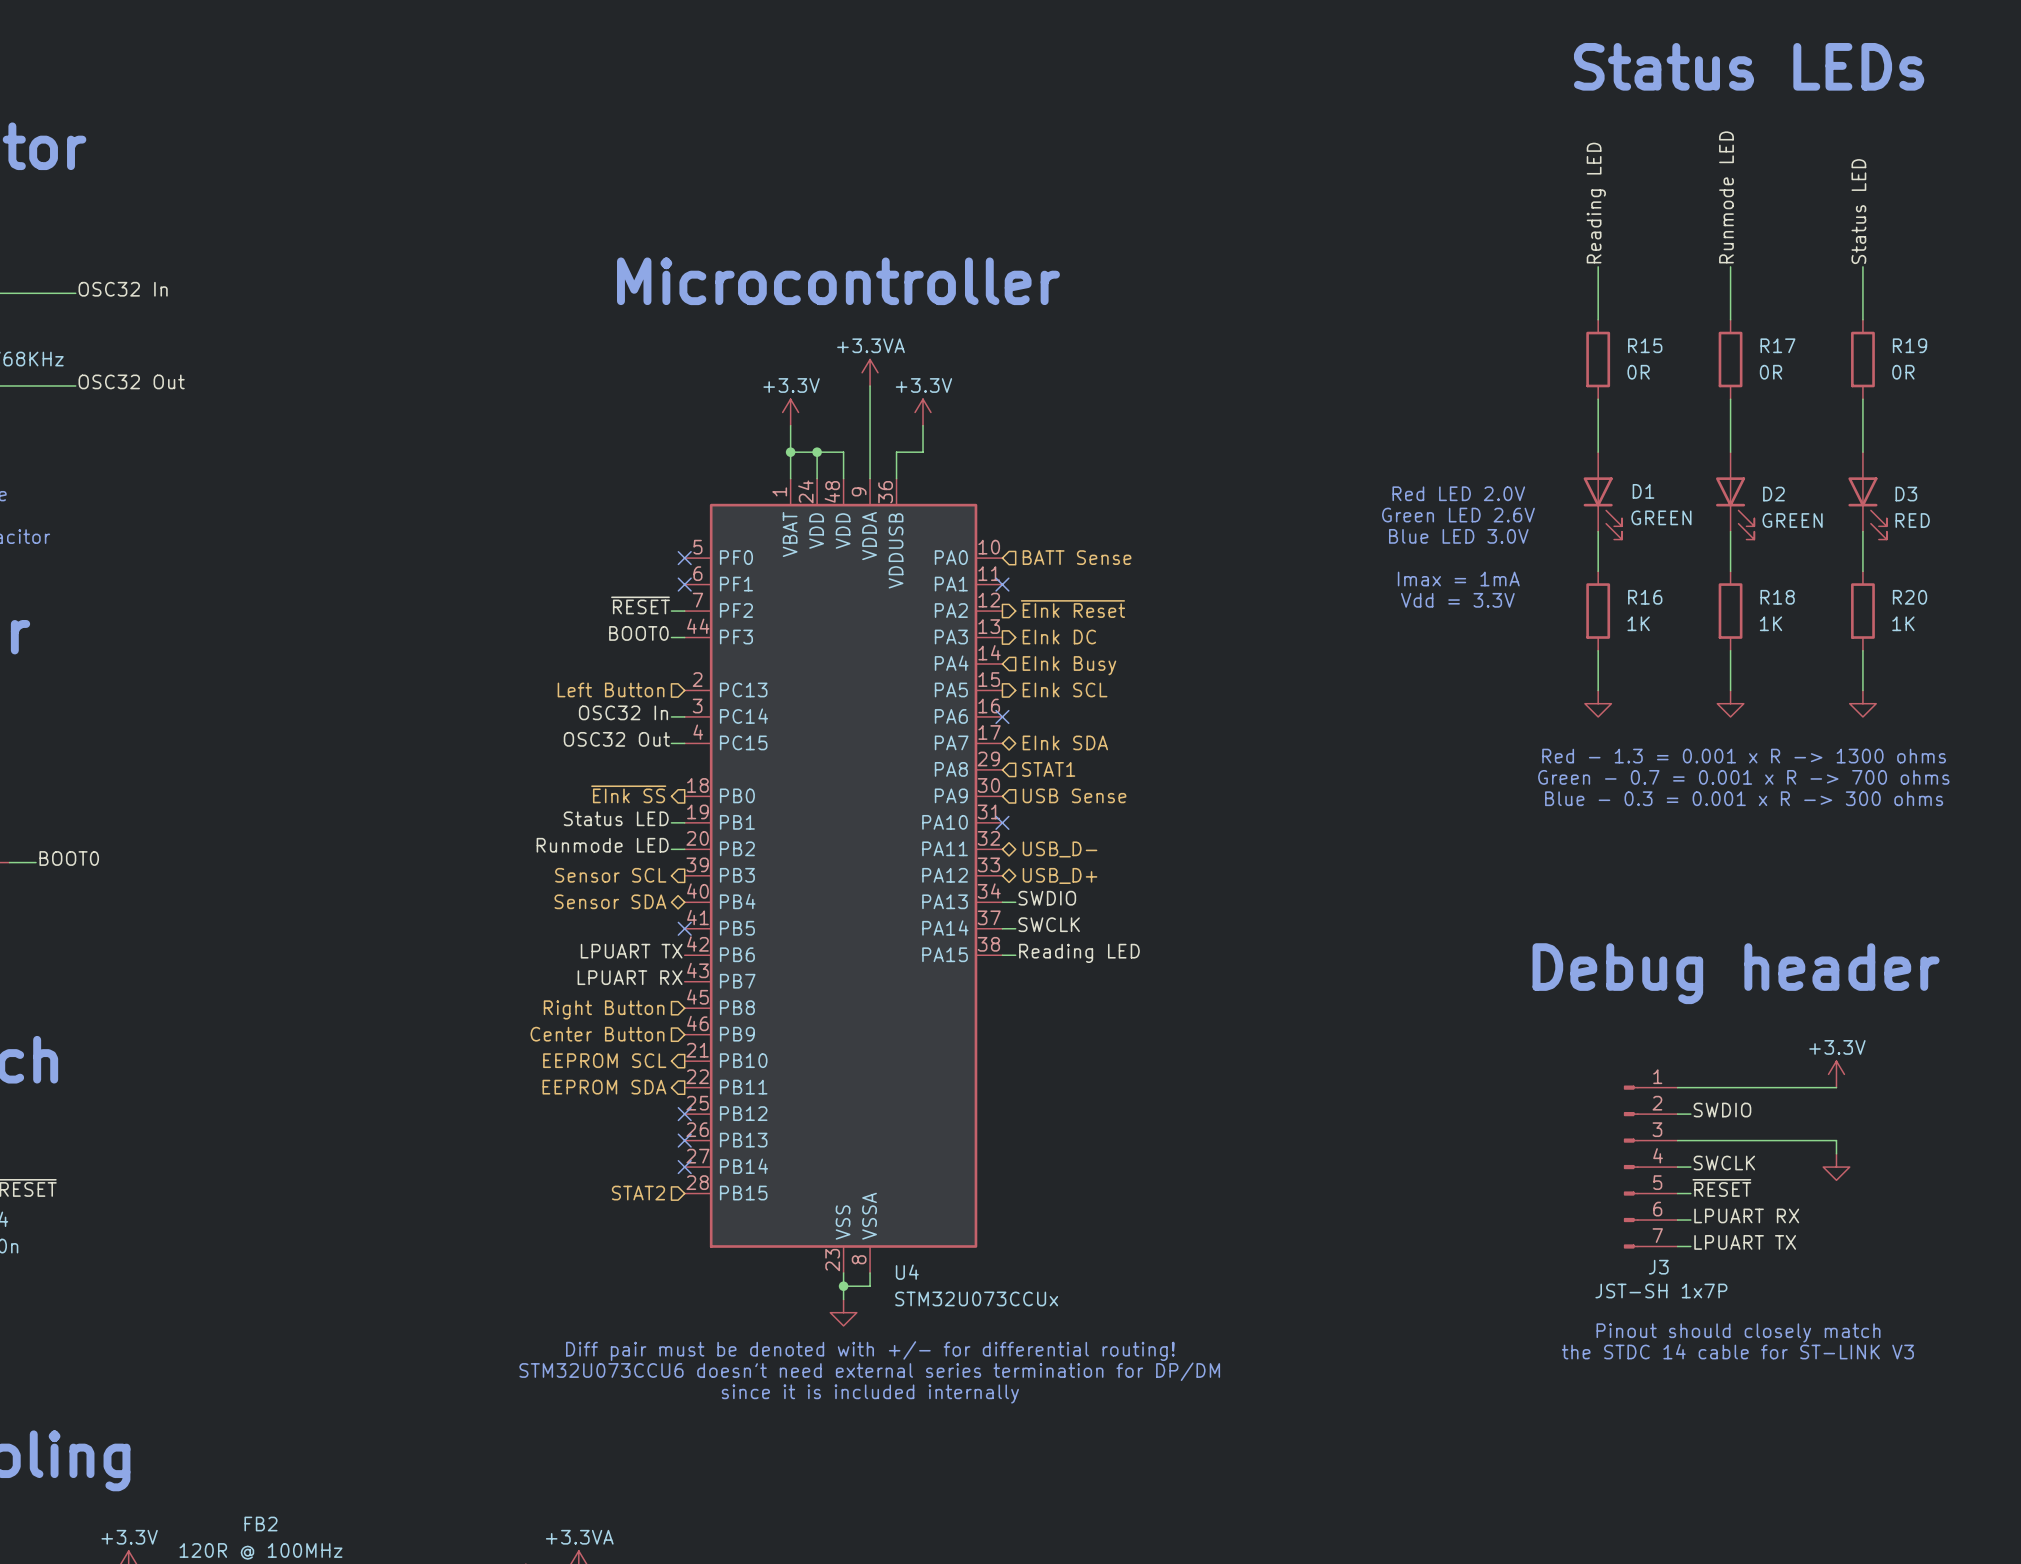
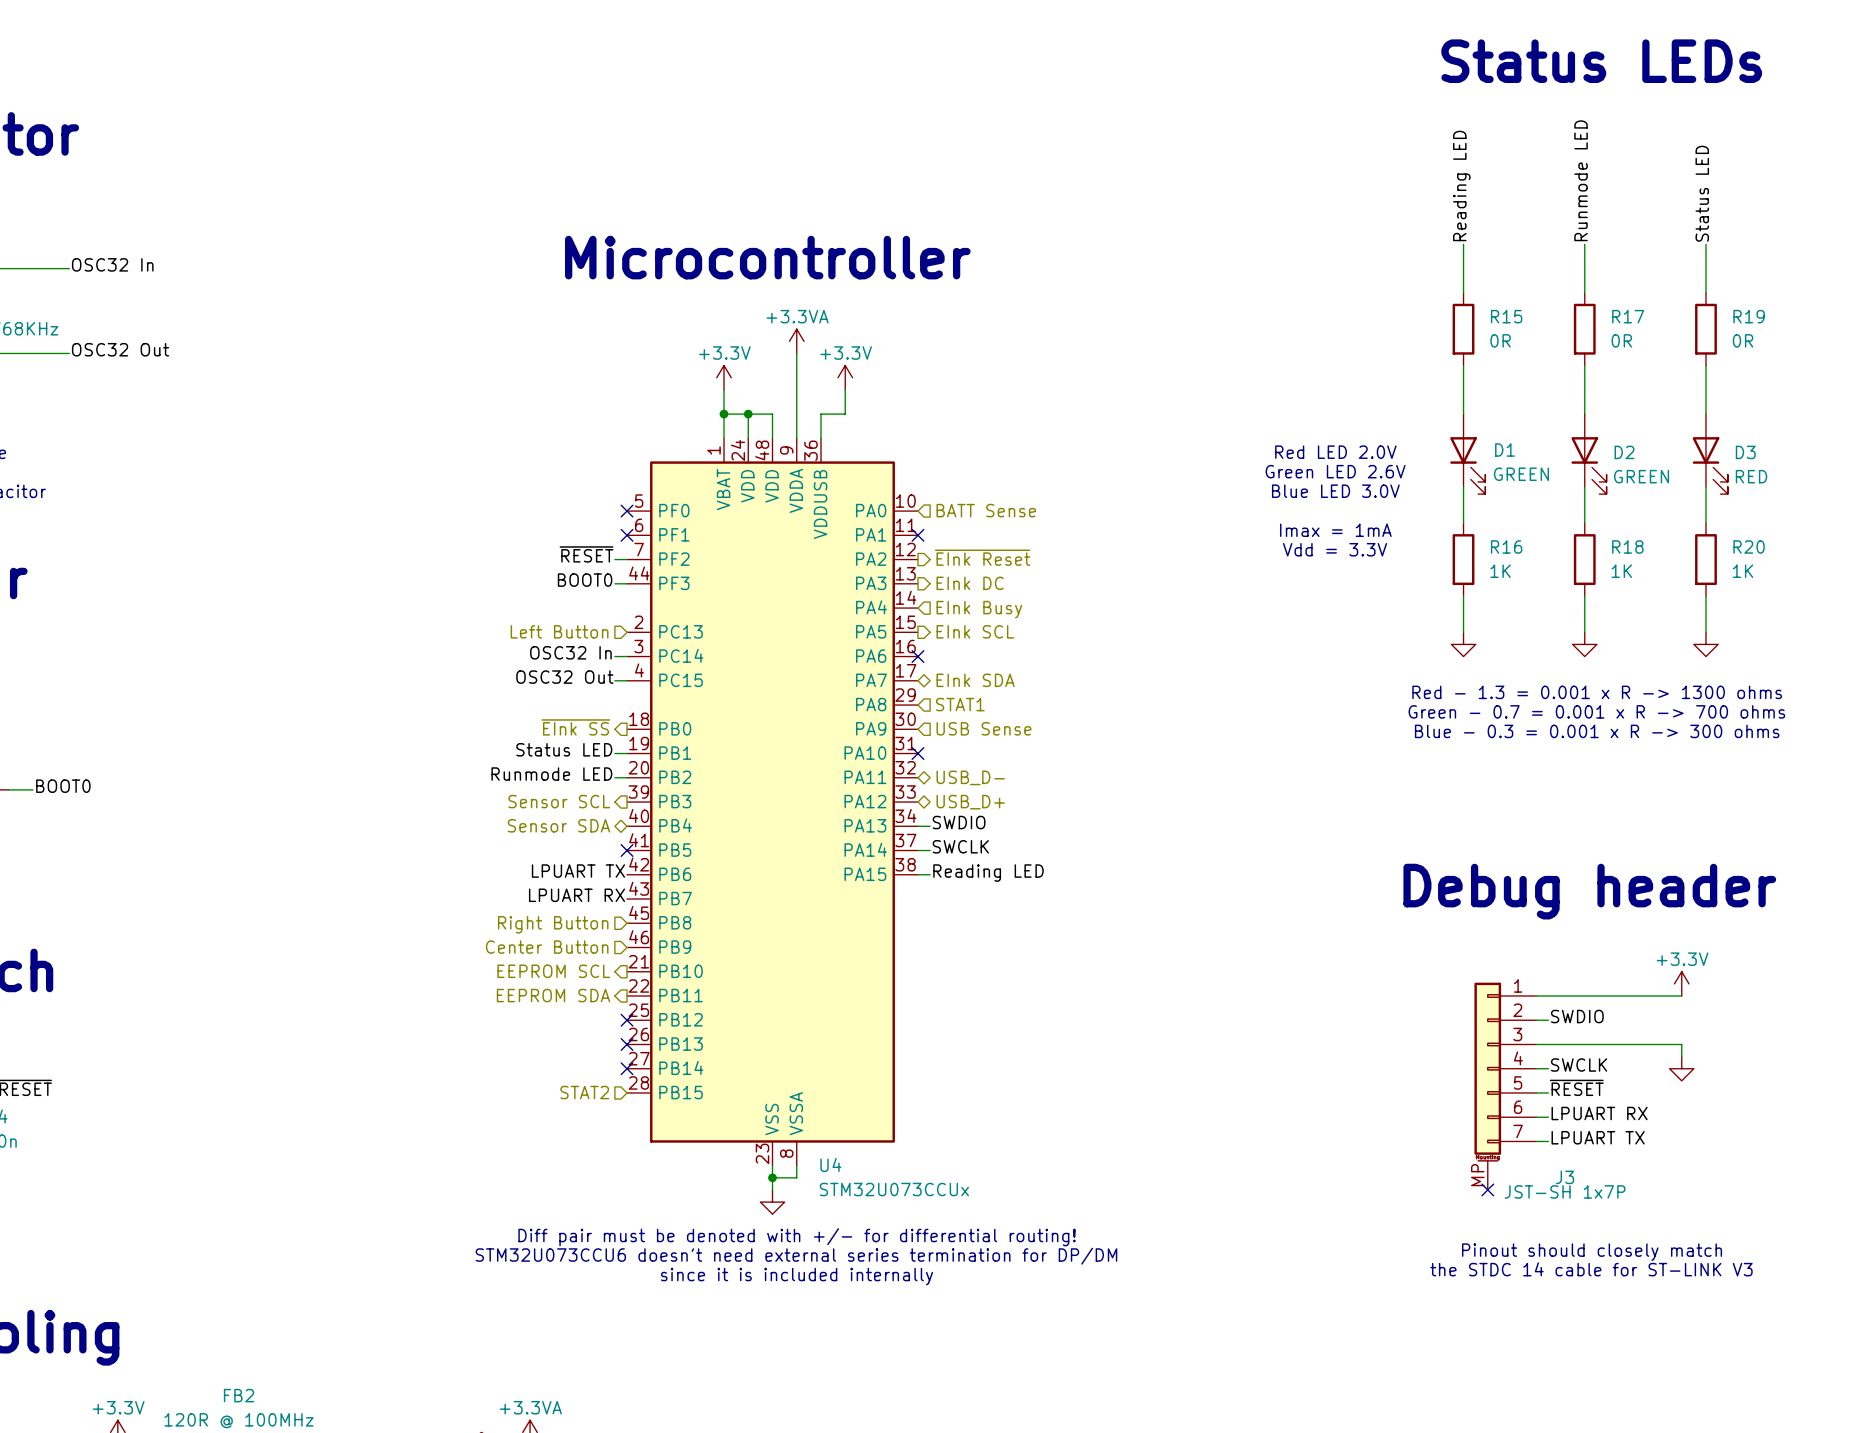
J3 symbol: [1623, 1085, 1678, 1249] -> [1474, 982, 1537, 1190]
J3 name position: J3 (1658, 1267) -> J3 (1565, 1177)
J3 value position: JST-SH 1x7P (1661, 1291) -> JST-SH 1x7P (1565, 1191)
no-connect mark: none -> (1487, 1189)
text position: Pinout should closely match (1738, 1332) -> Pinout should closely match (1592, 1252)
text position: the STDC 14 cable for ST-LINK V3 (1737, 1351) -> the STDC 14 cable for ST-LINK V3 (1591, 1269)

